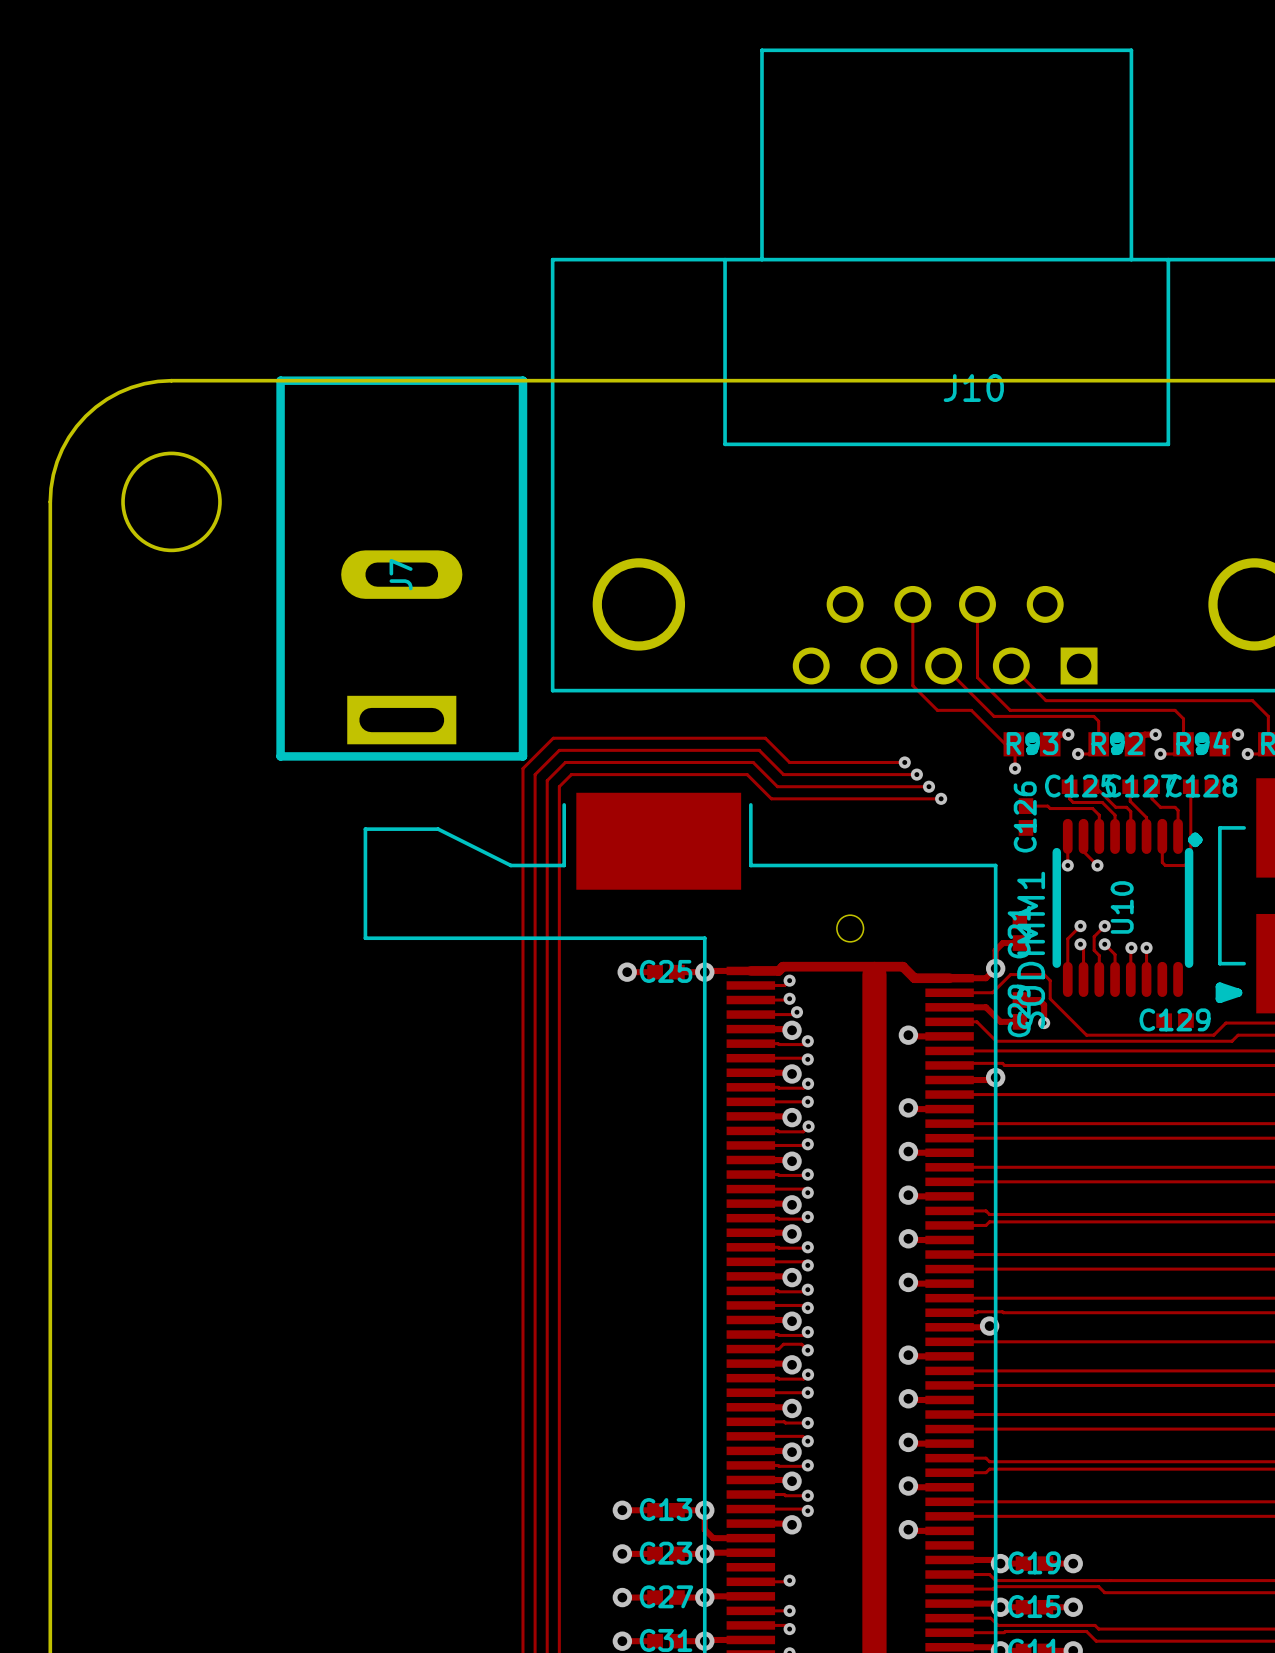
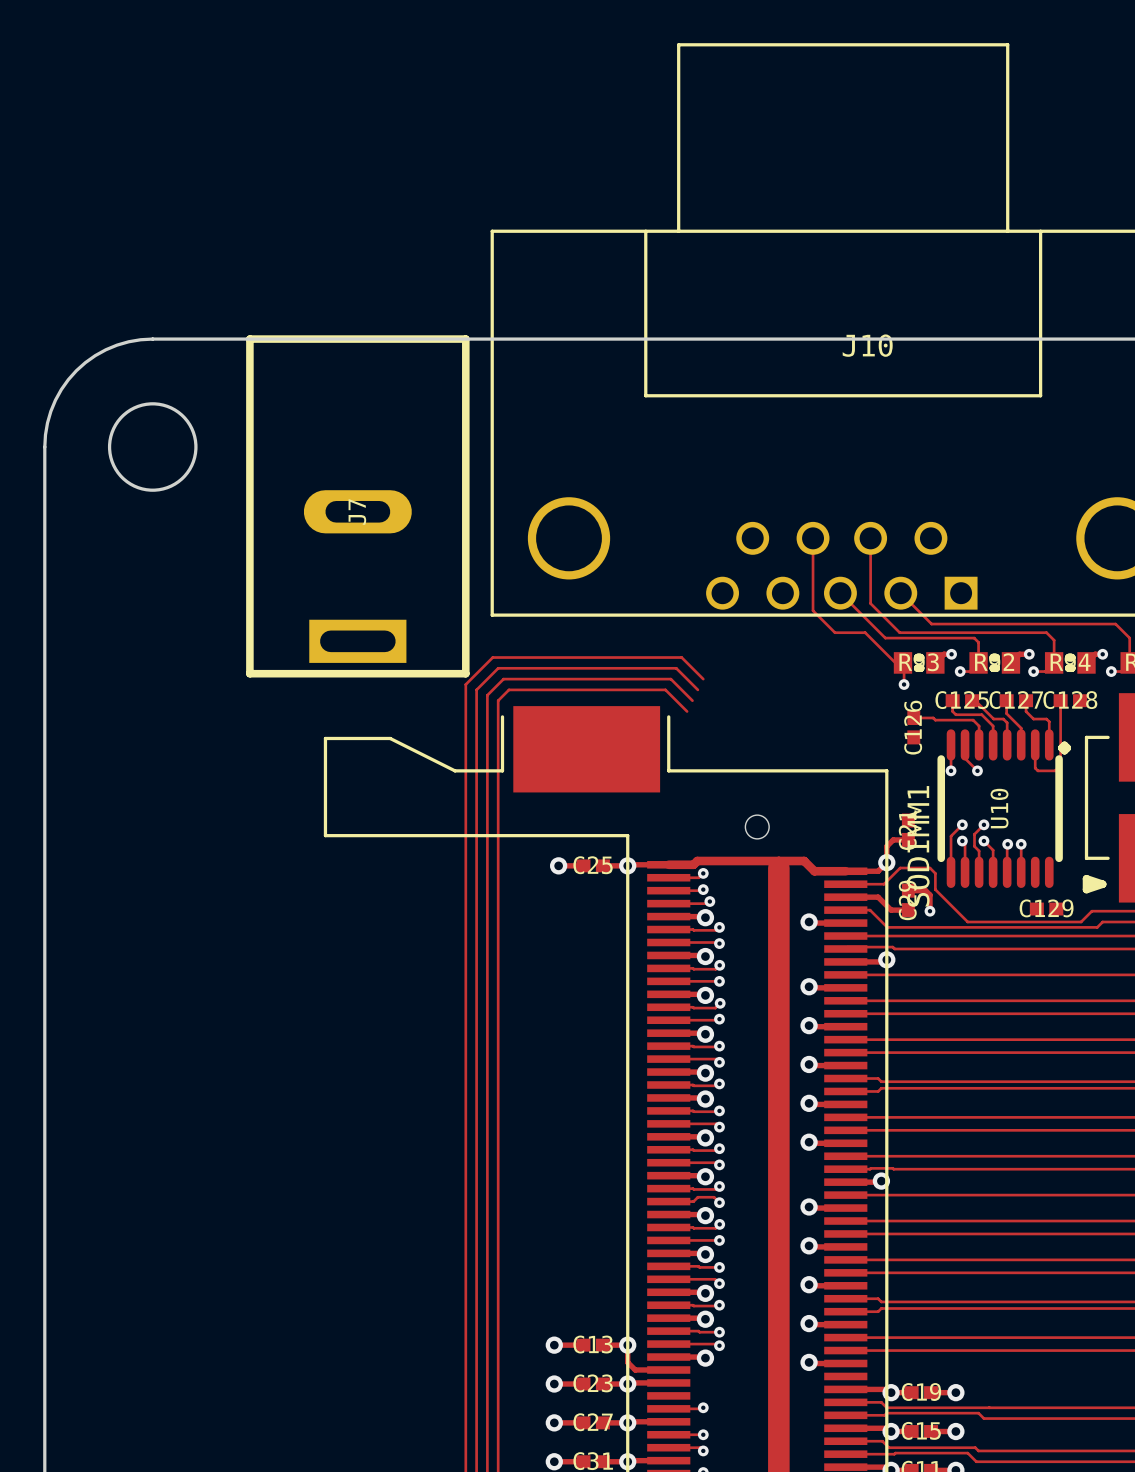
track: (789, 762) (904, 762) -> none
via: (904, 762) -> none
track: (783, 774) (916, 774) -> none
via: (916, 774) -> none
track: (777, 786) (929, 786) -> none
via: (929, 786) -> none
track: (771, 798) (941, 798) -> none
via: (941, 798) -> none

